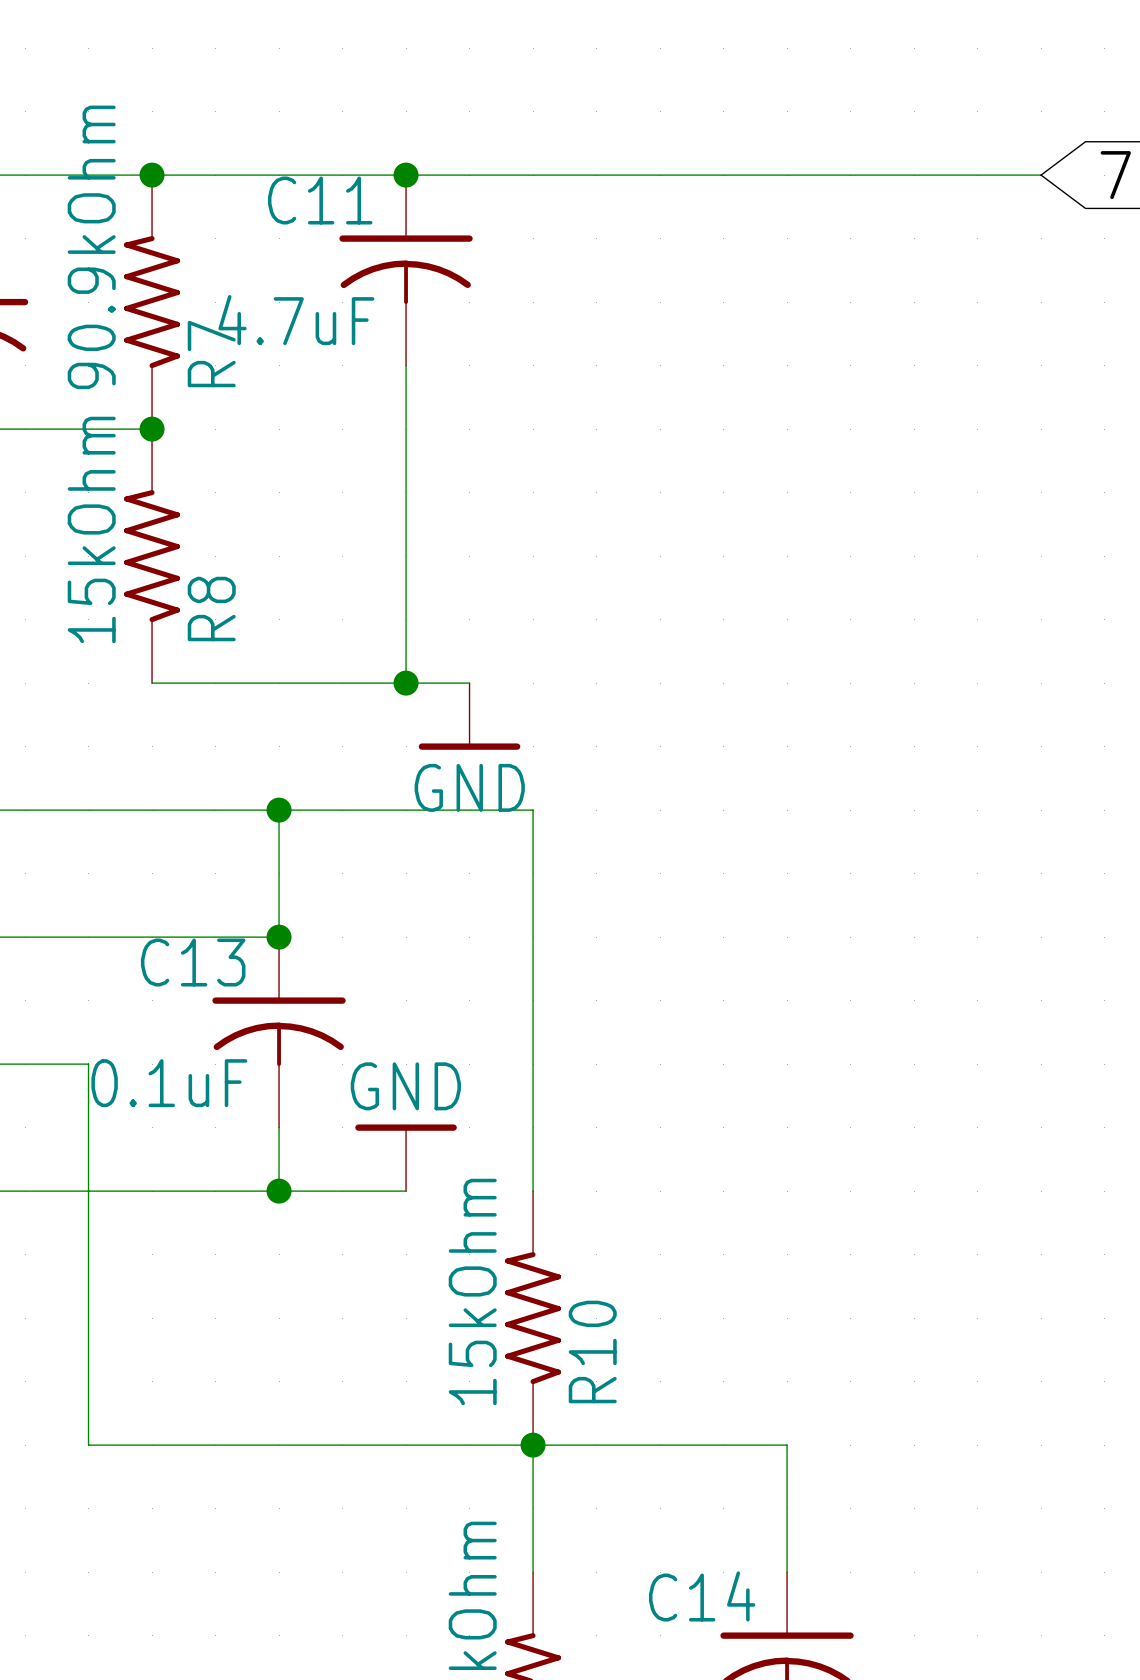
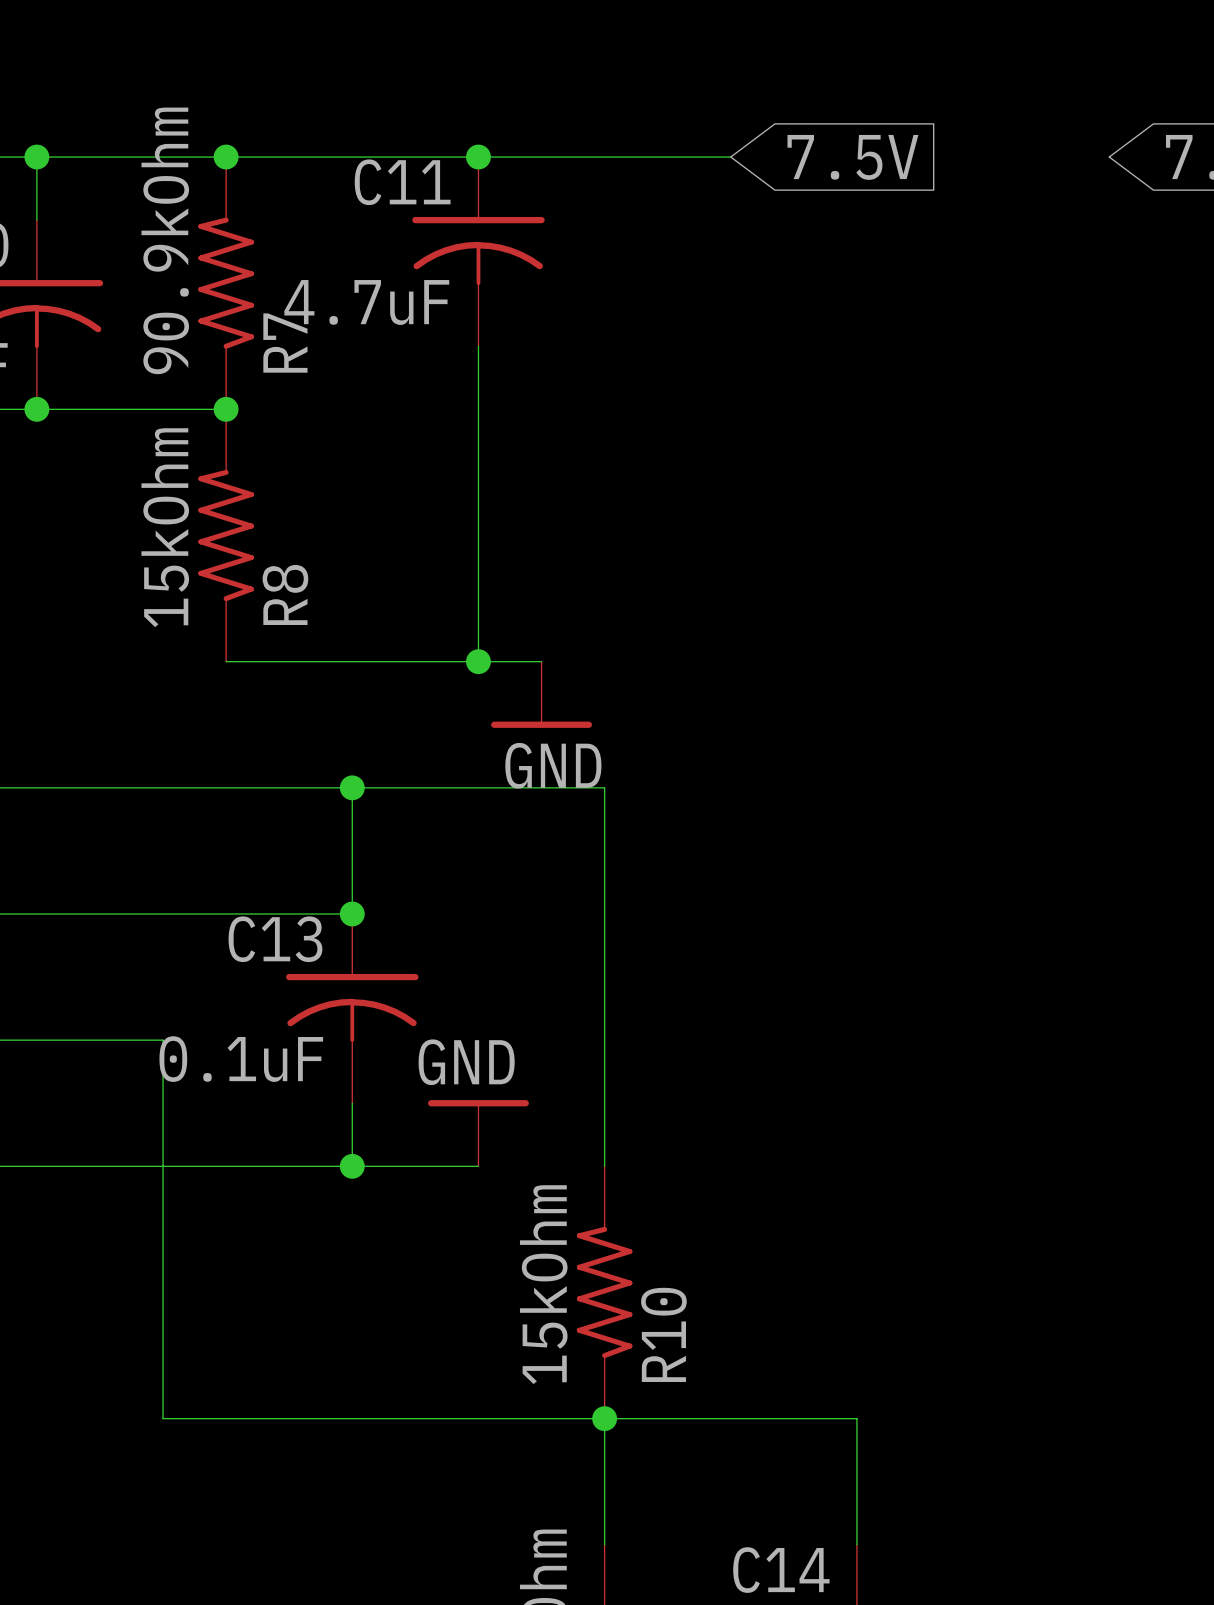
wire: (660, 175) (1041, 175) -> none
global label: none -> 7.5V (852, 157)

